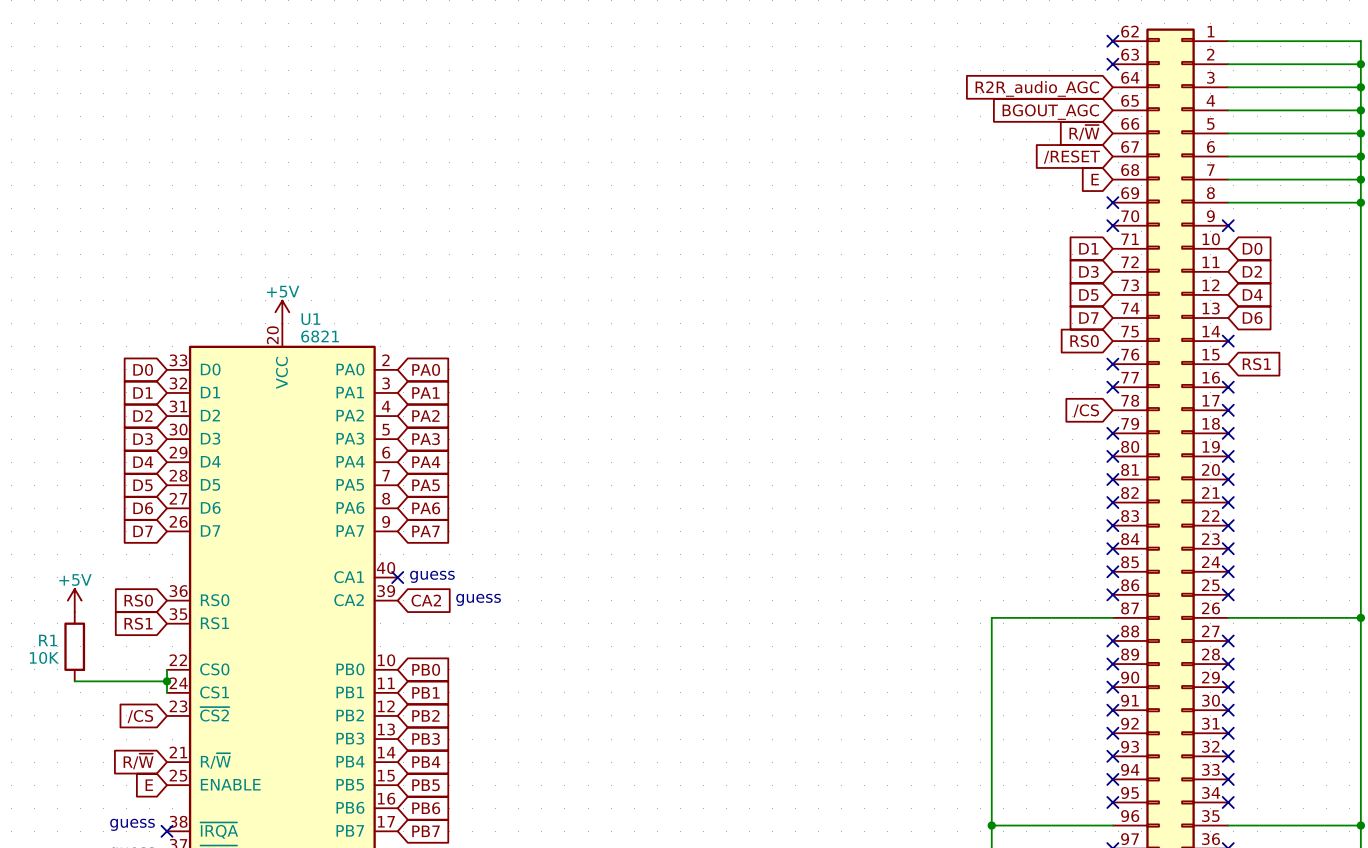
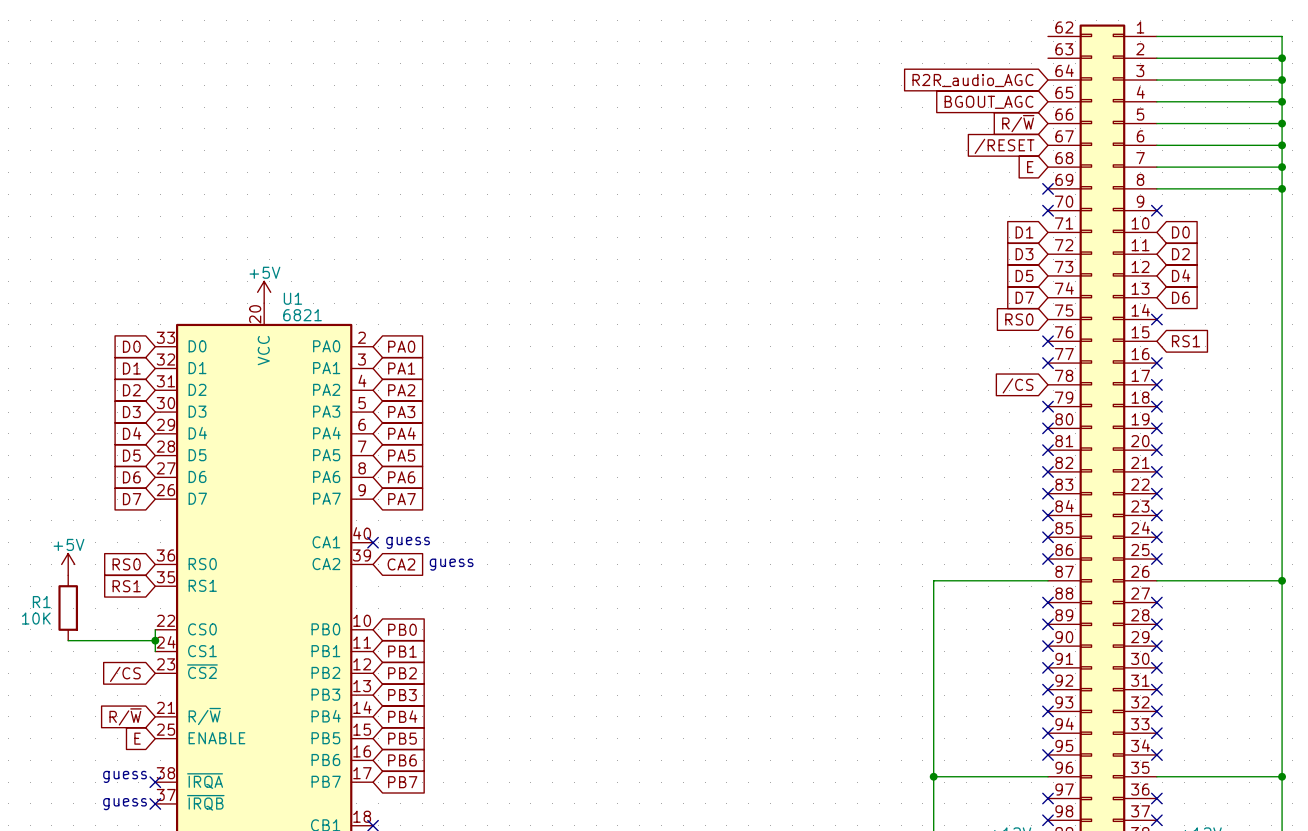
no-connect mark: (1112, 41) -> none
no-connect mark: (1112, 64) -> none

